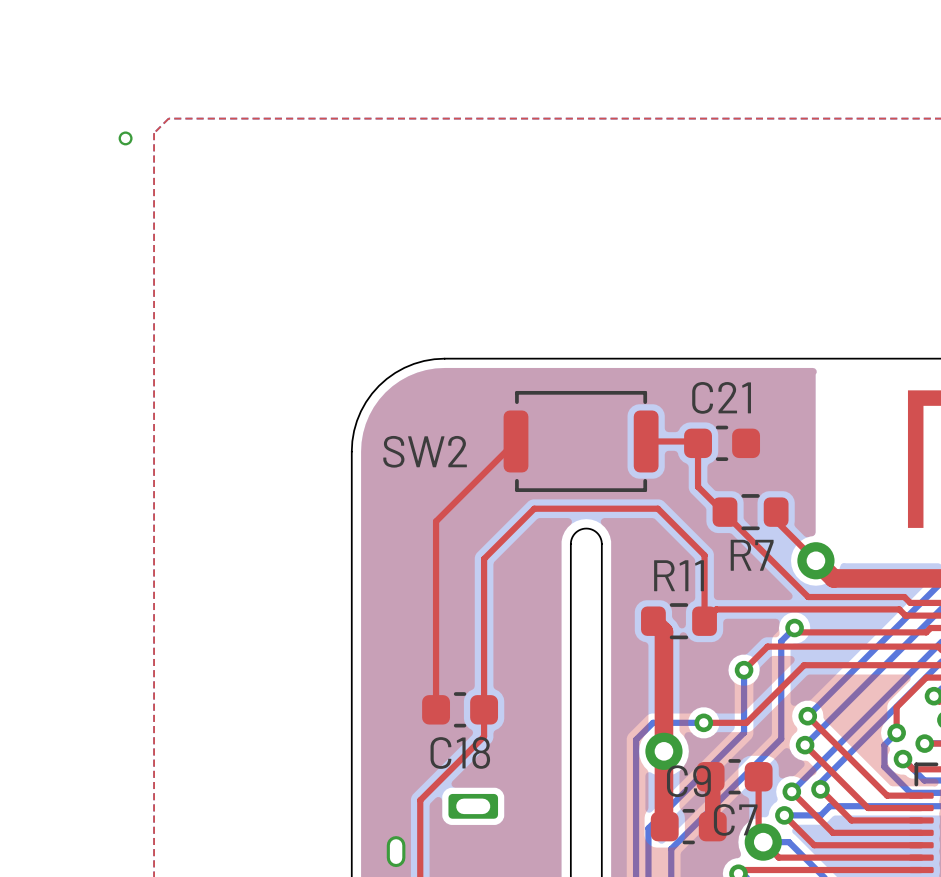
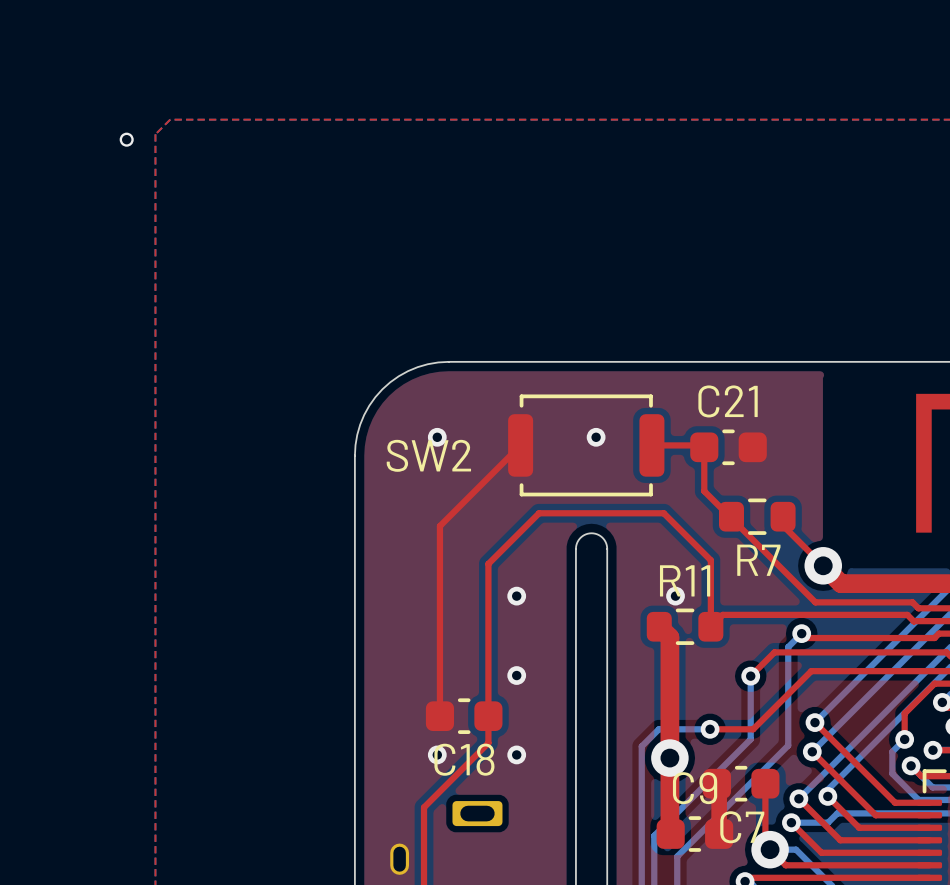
via: none -> (437, 437)
via: none -> (596, 437)
via: none -> (516, 596)
via: none -> (675, 596)
via: none -> (516, 675)
via: none -> (437, 754)
via: none -> (516, 754)

